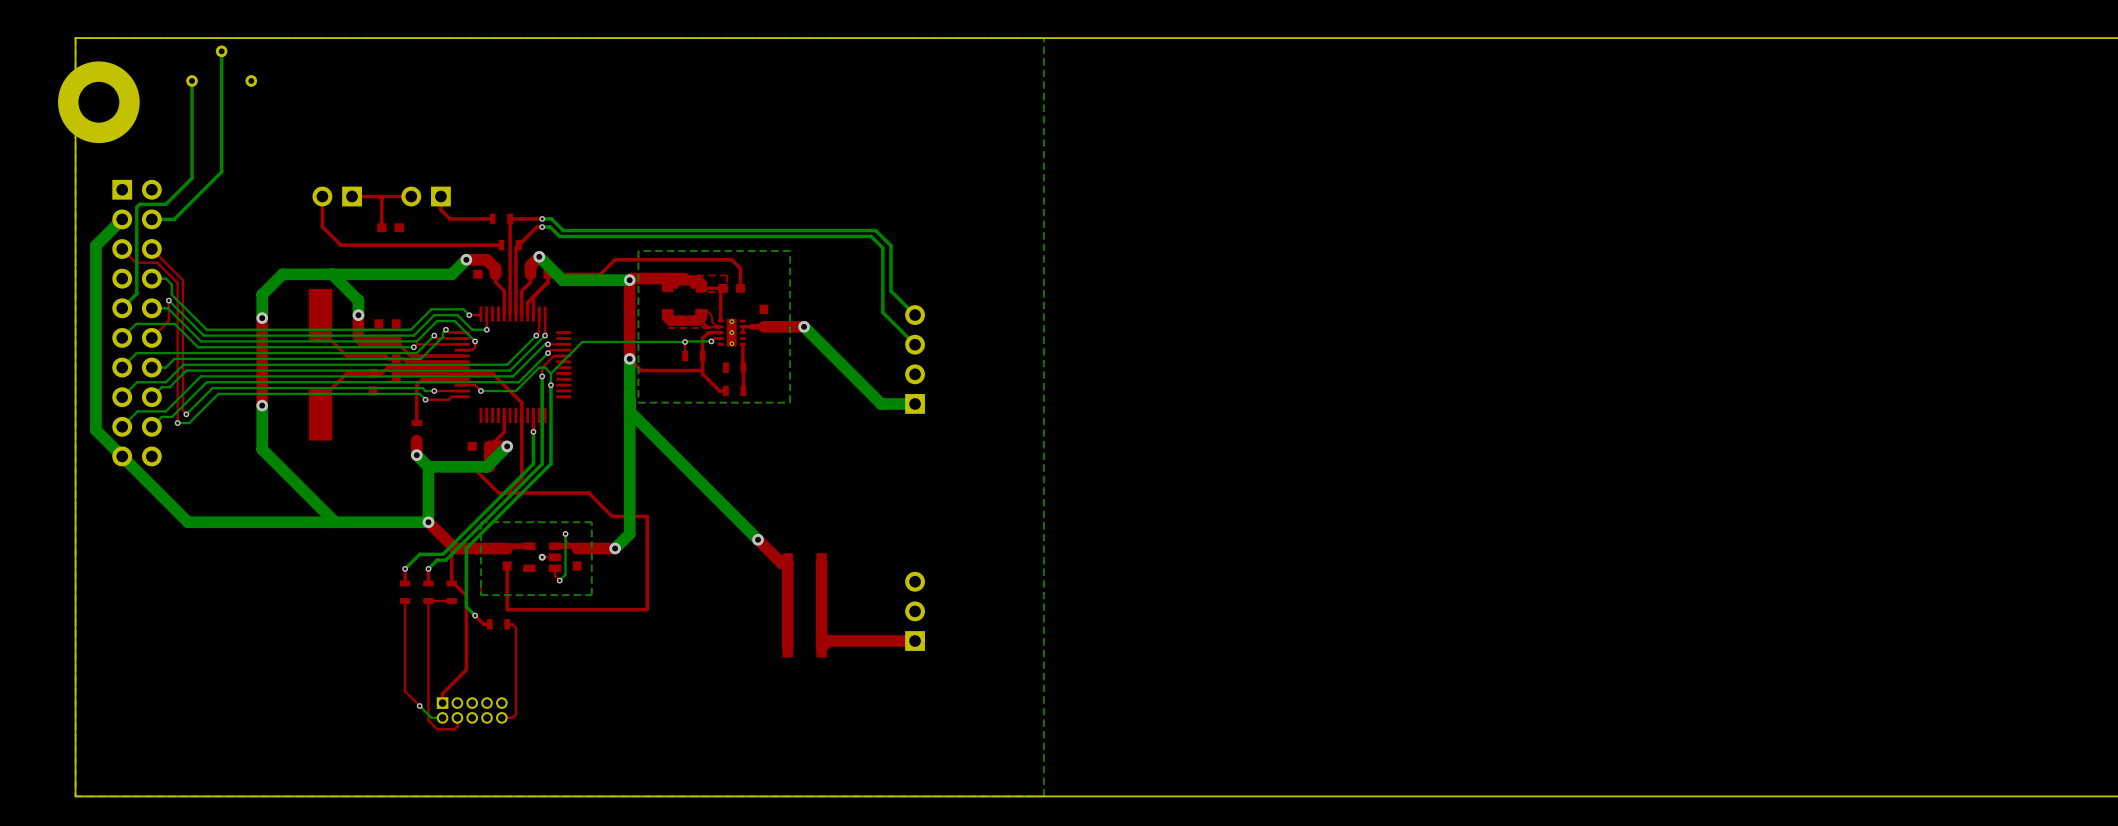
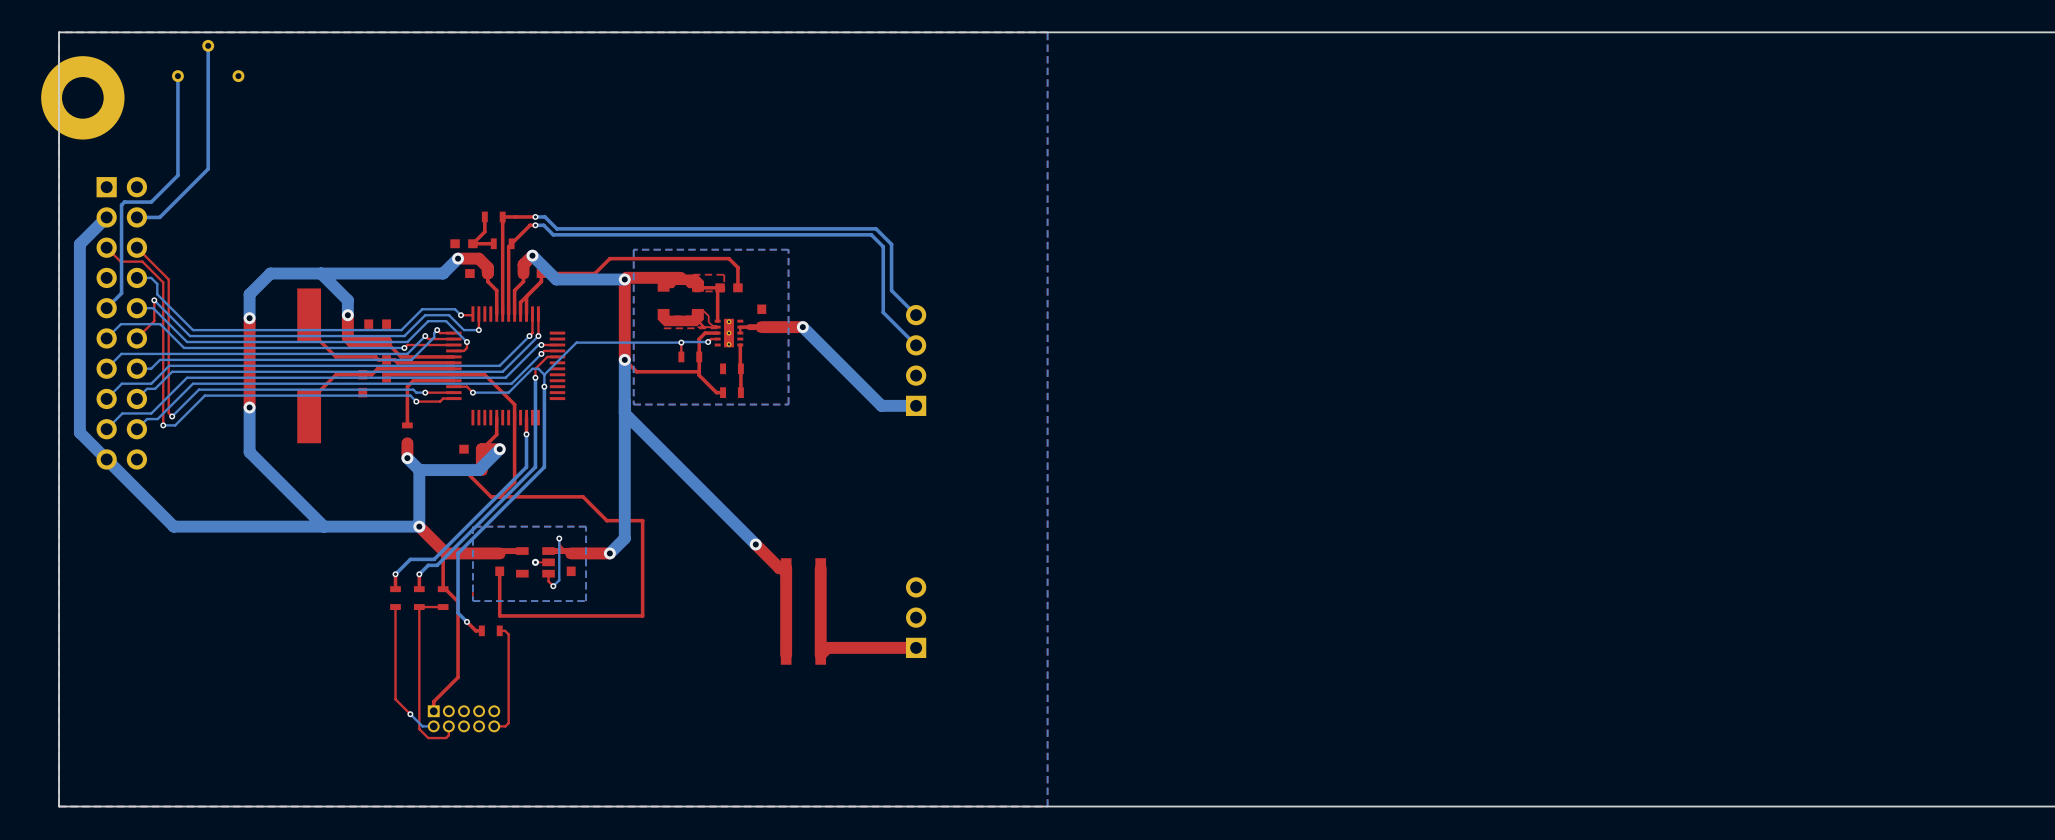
top track: (322, 196) (322, 226) (340, 245) (480, 245) -> (484, 222) (484, 231) (472, 243)
part: (337, 196) -> none
top track: (378, 196) (381, 199) (381, 227) -> none
top track: (411, 196) (352, 196) -> none
part: (426, 196) -> none
top track: (440, 196) (440, 209) (449, 218) (492, 218) -> none
part position: (390, 227) -> (463, 243)

